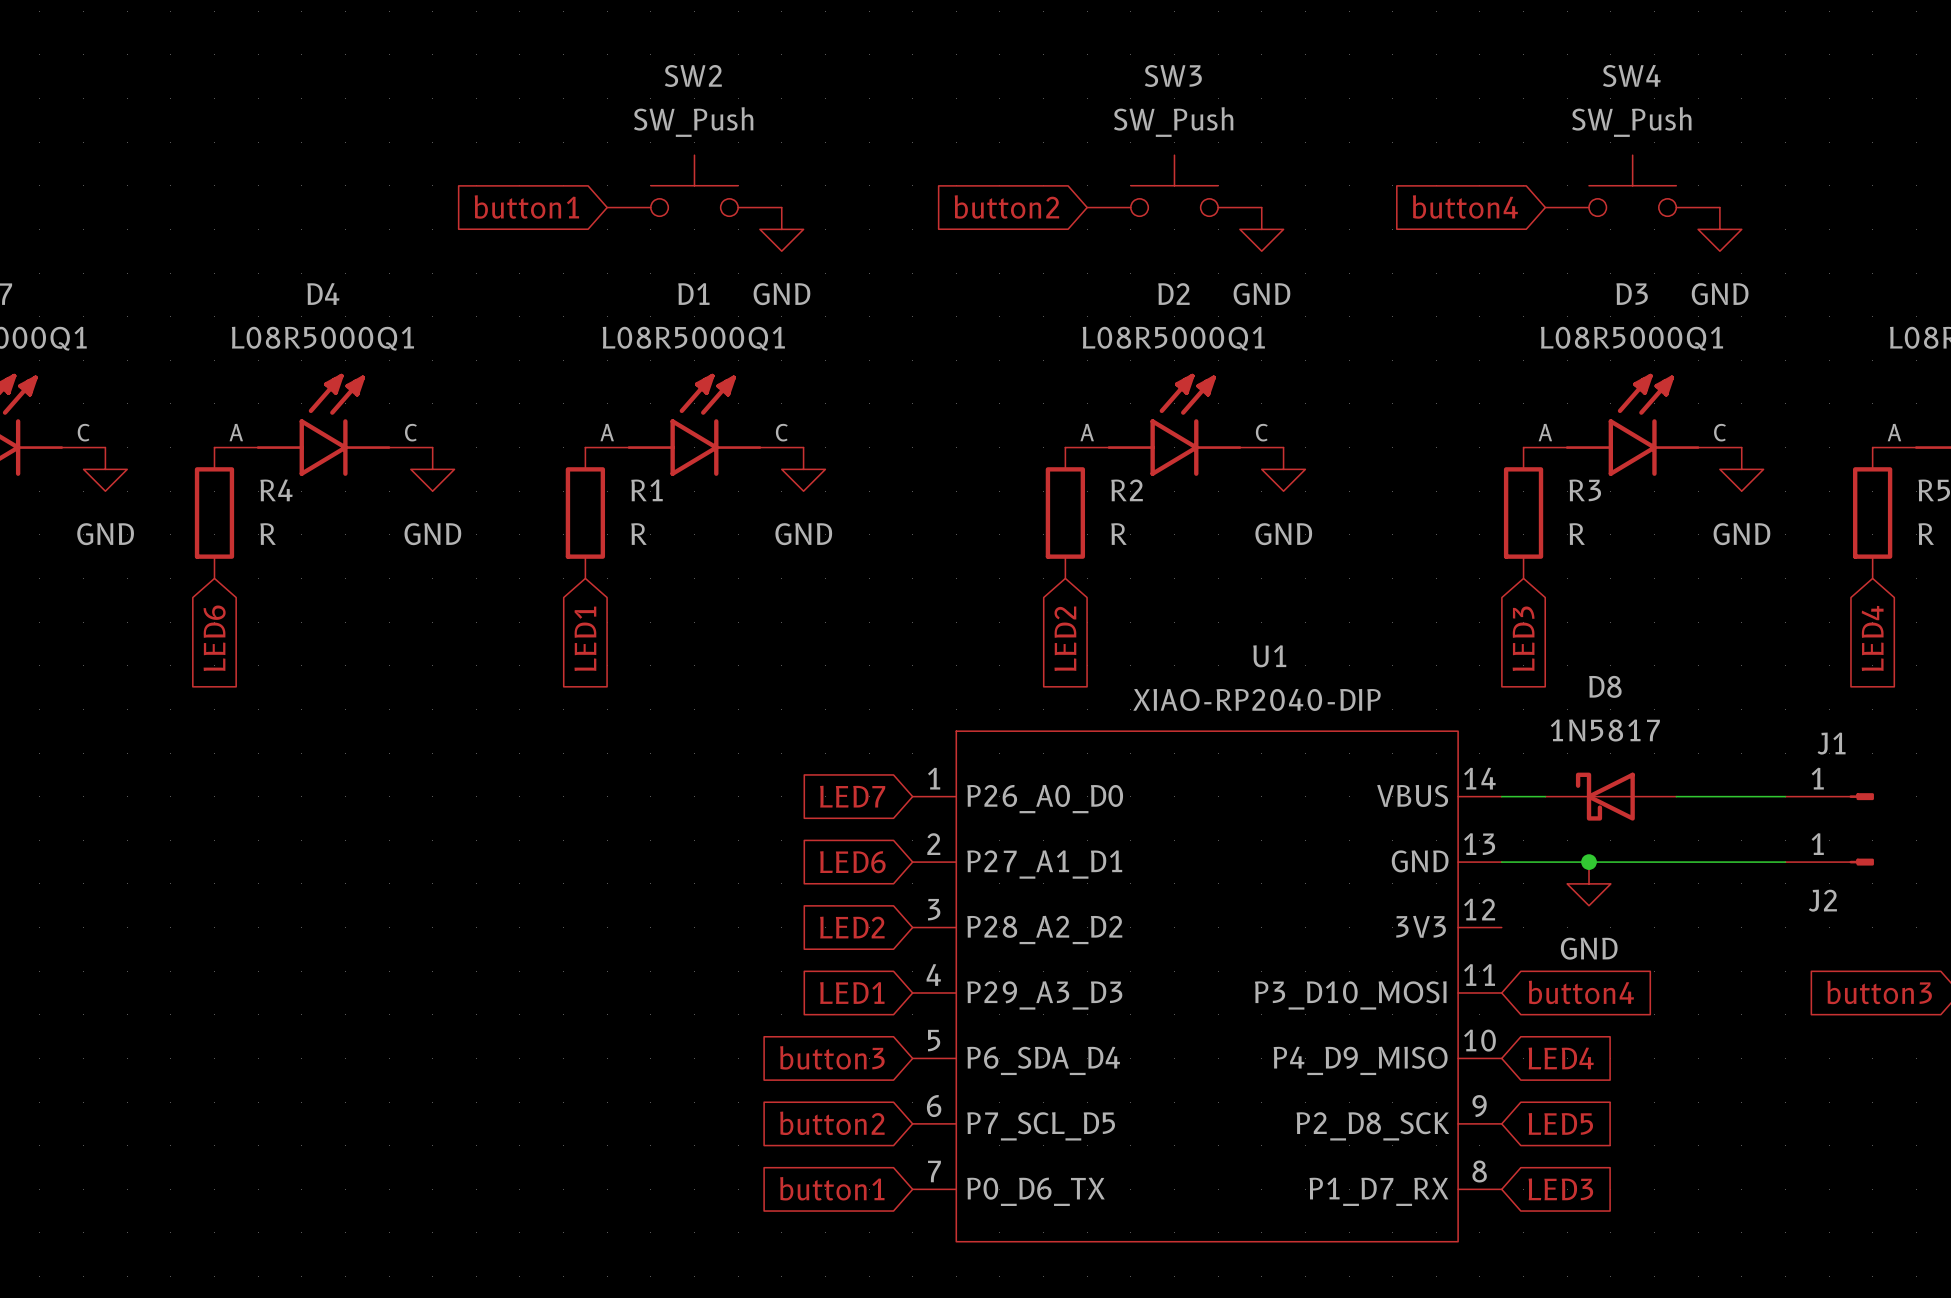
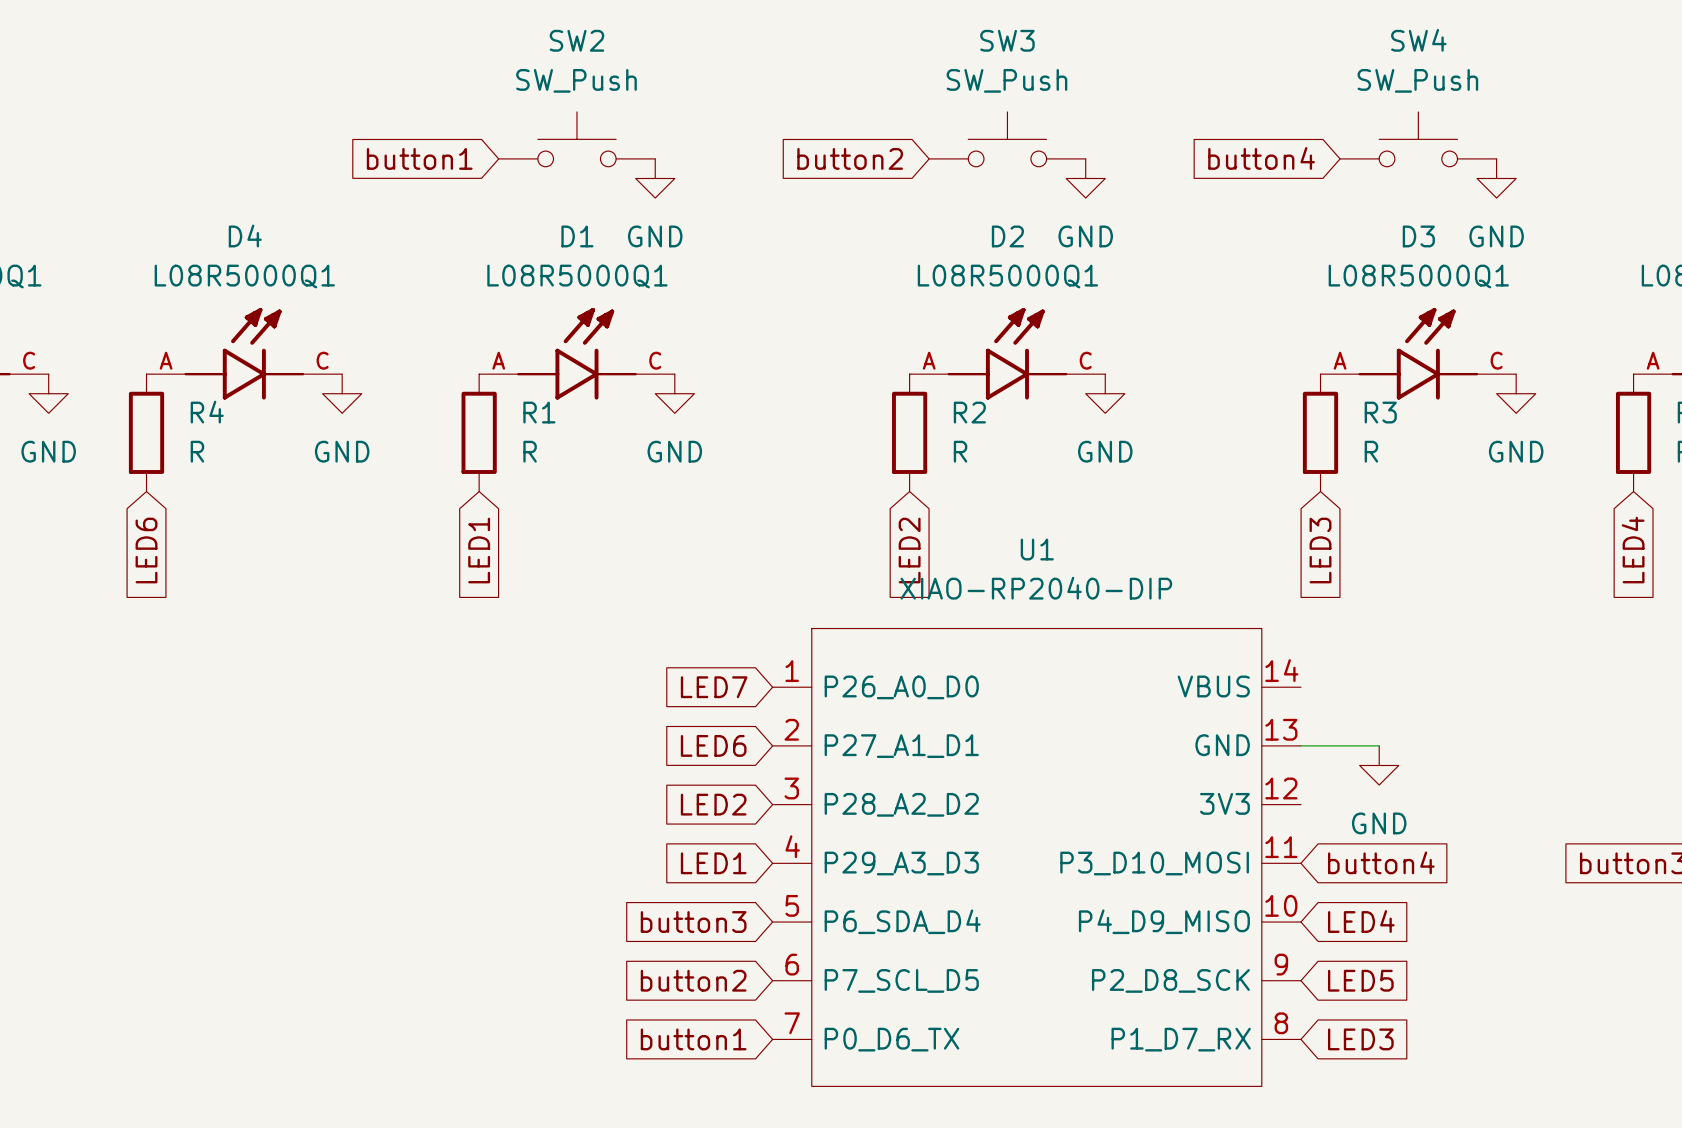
U1 name position: U1 (1269, 656) -> U1 (1037, 549)
U1 value position: XIAO-RP2040-DIP (1256, 699) -> XIAO-RP2040-DIP (1036, 588)
wire: (1501, 796) (1545, 796) -> none
D8: 1N5817 (1610, 796) -> none
wire: (1676, 796) (1785, 796) -> none
J1: (1829, 796) -> none
wire: (1589, 862) (1785, 862) -> none
junction: (1589, 862) -> none
J2: (1829, 862) -> none

